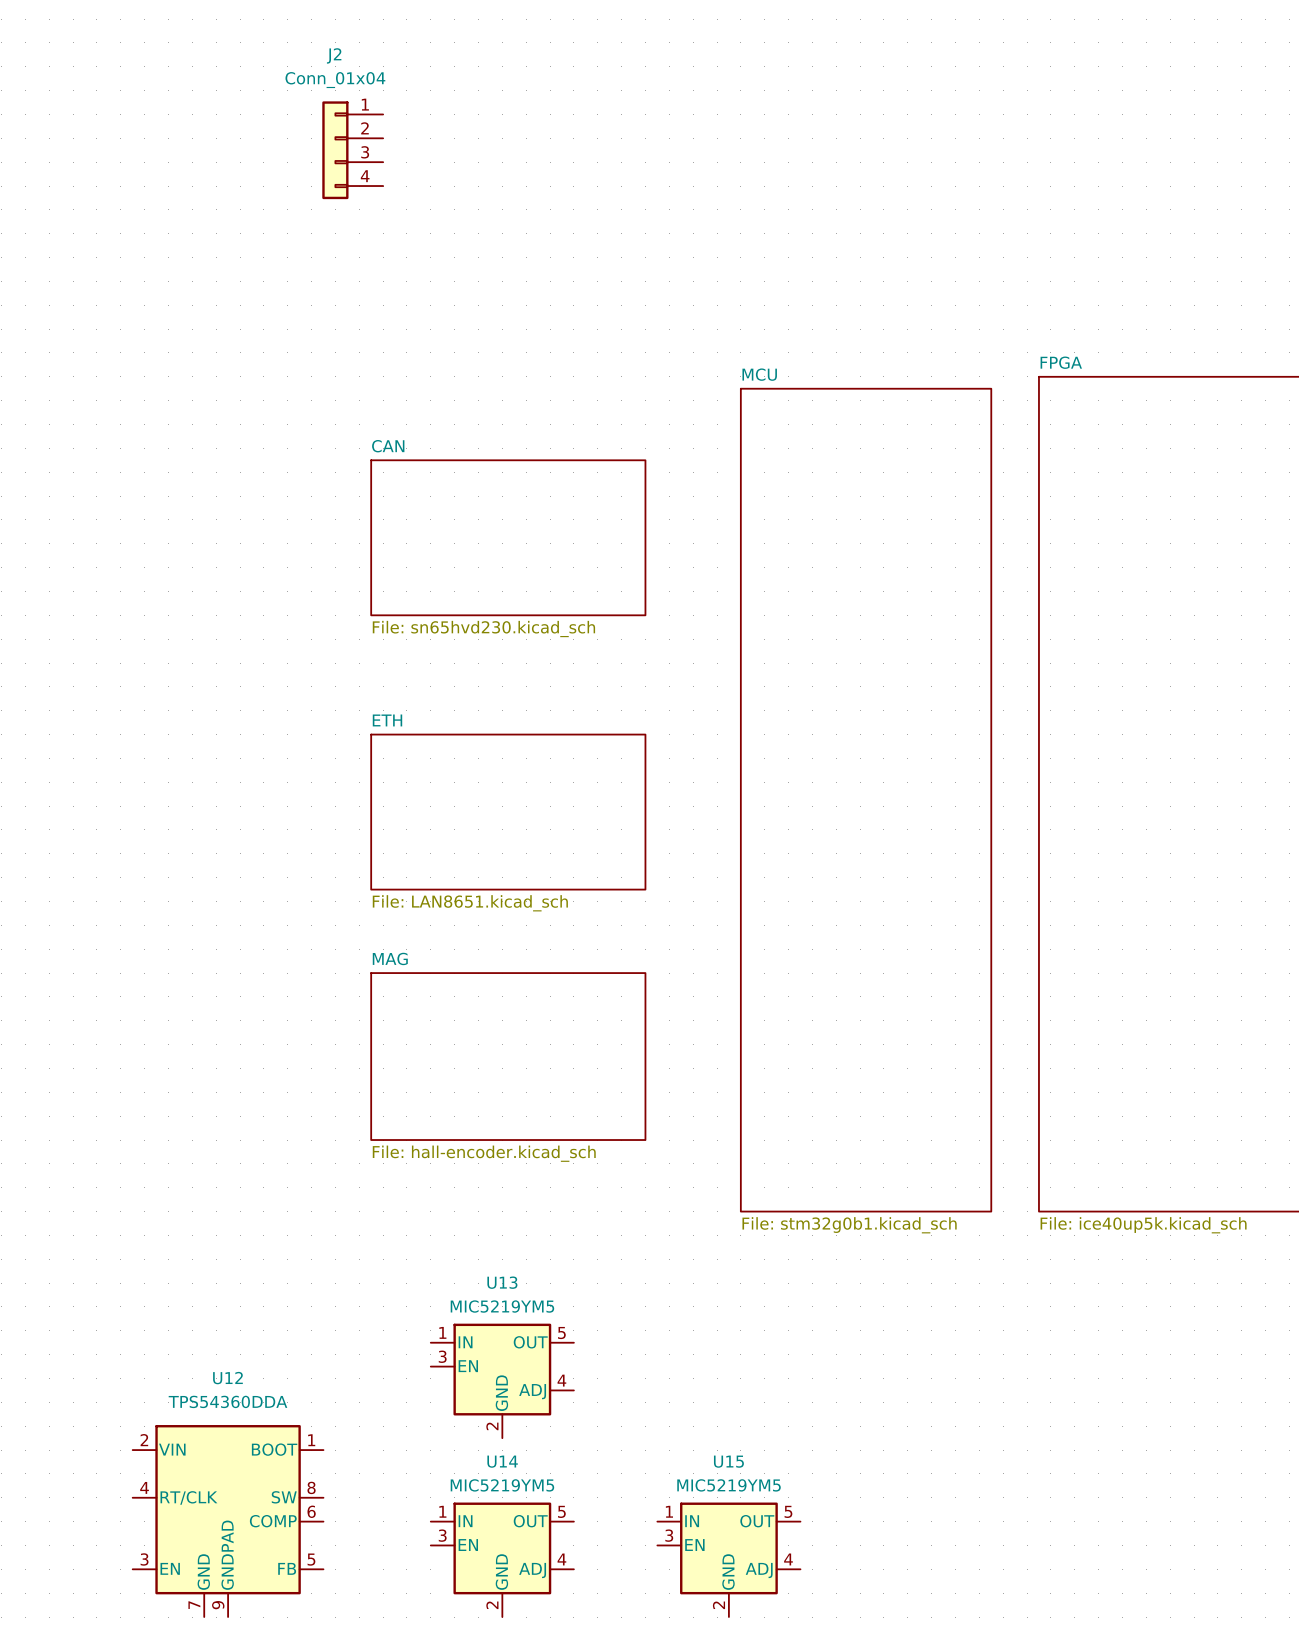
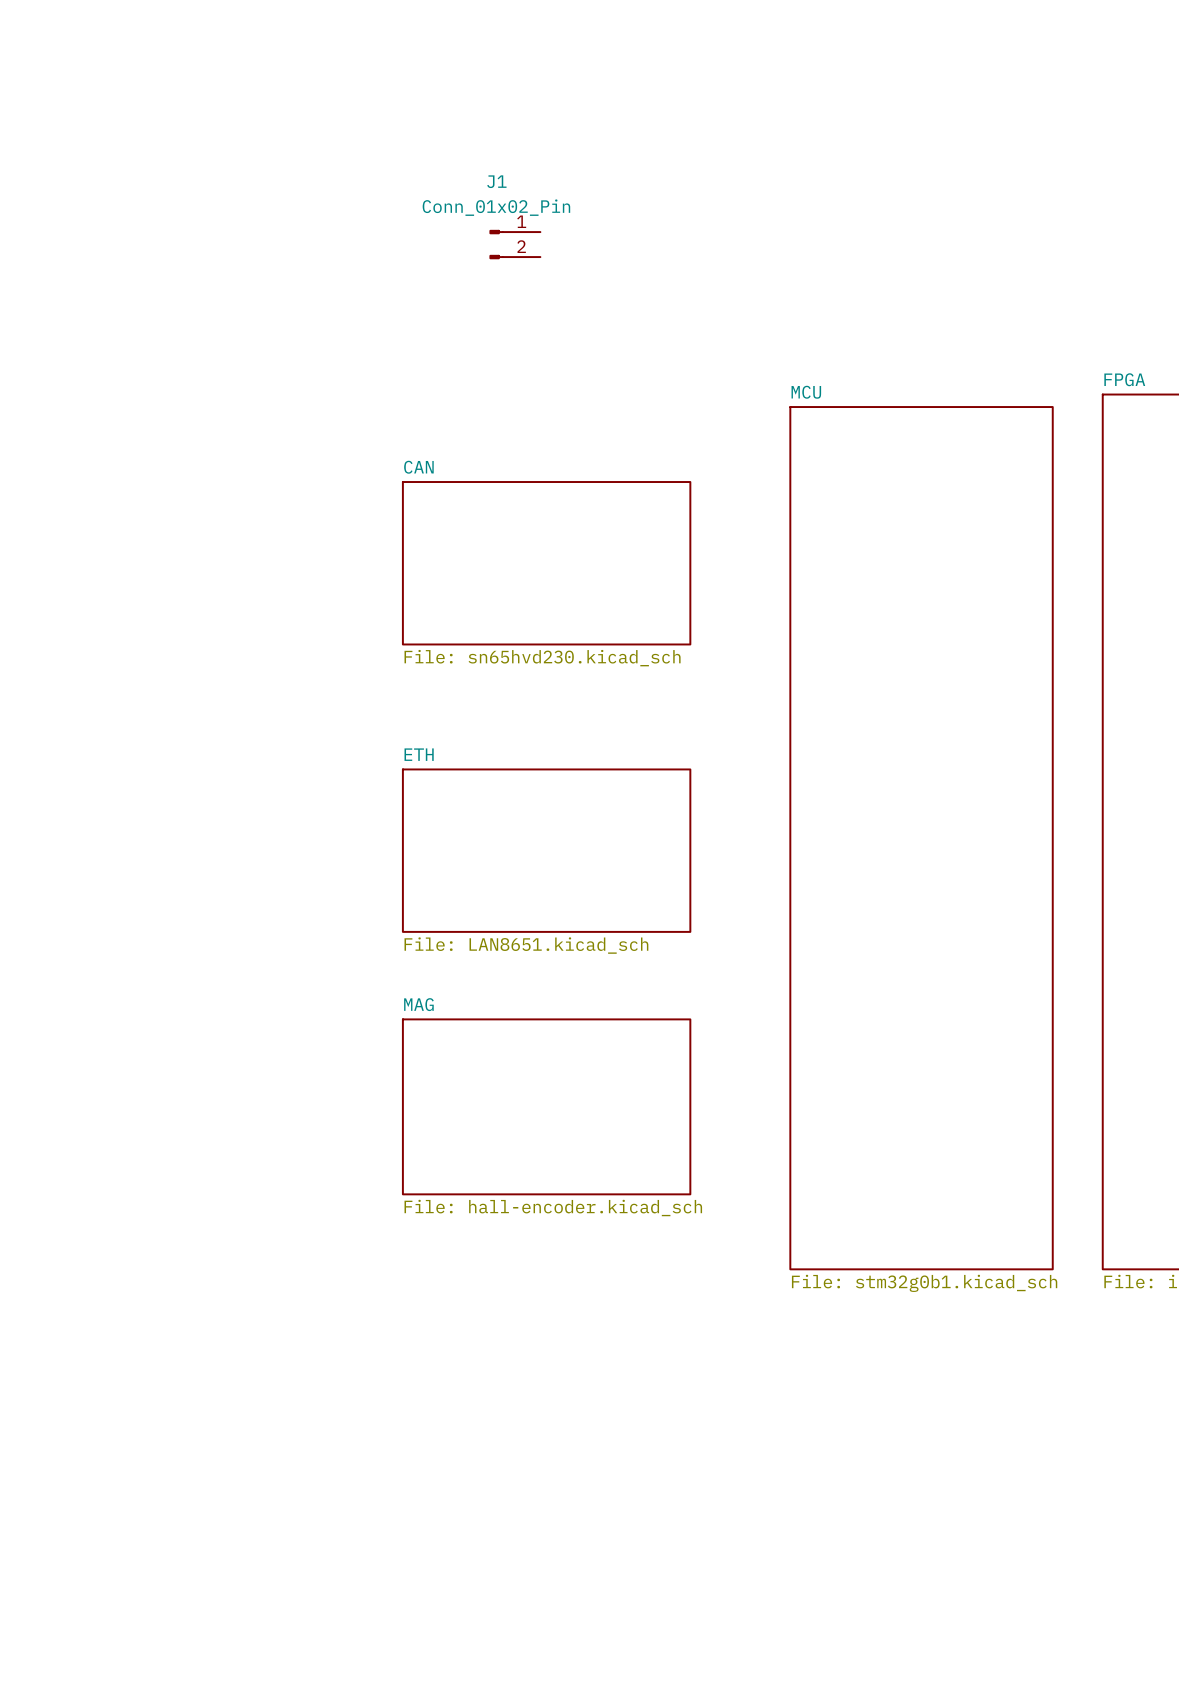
J2: Conn_01x04 (352, 150) -> none
J1: none -> Conn_01x02_Pin (515, 244)
U13: MIC5219YM5 (502, 1380) -> none
U12: TPS54360DDA (228, 1521) -> none
U14: MIC5219YM5 (502, 1559) -> none
U15: MIC5219YM5 (728, 1559) -> none

